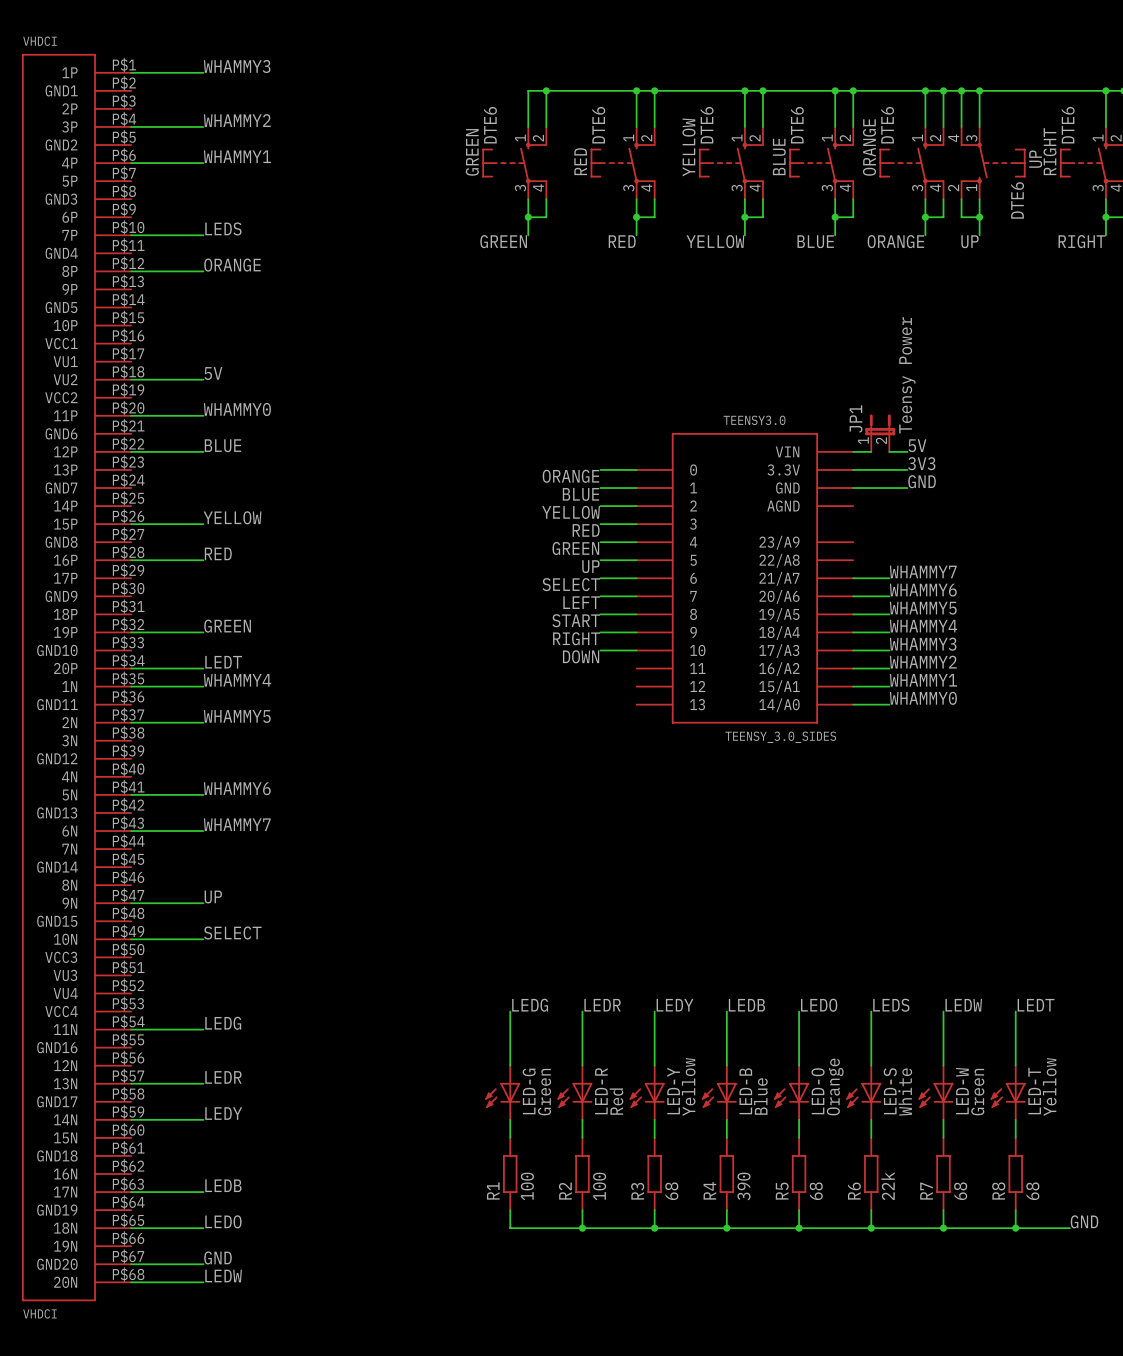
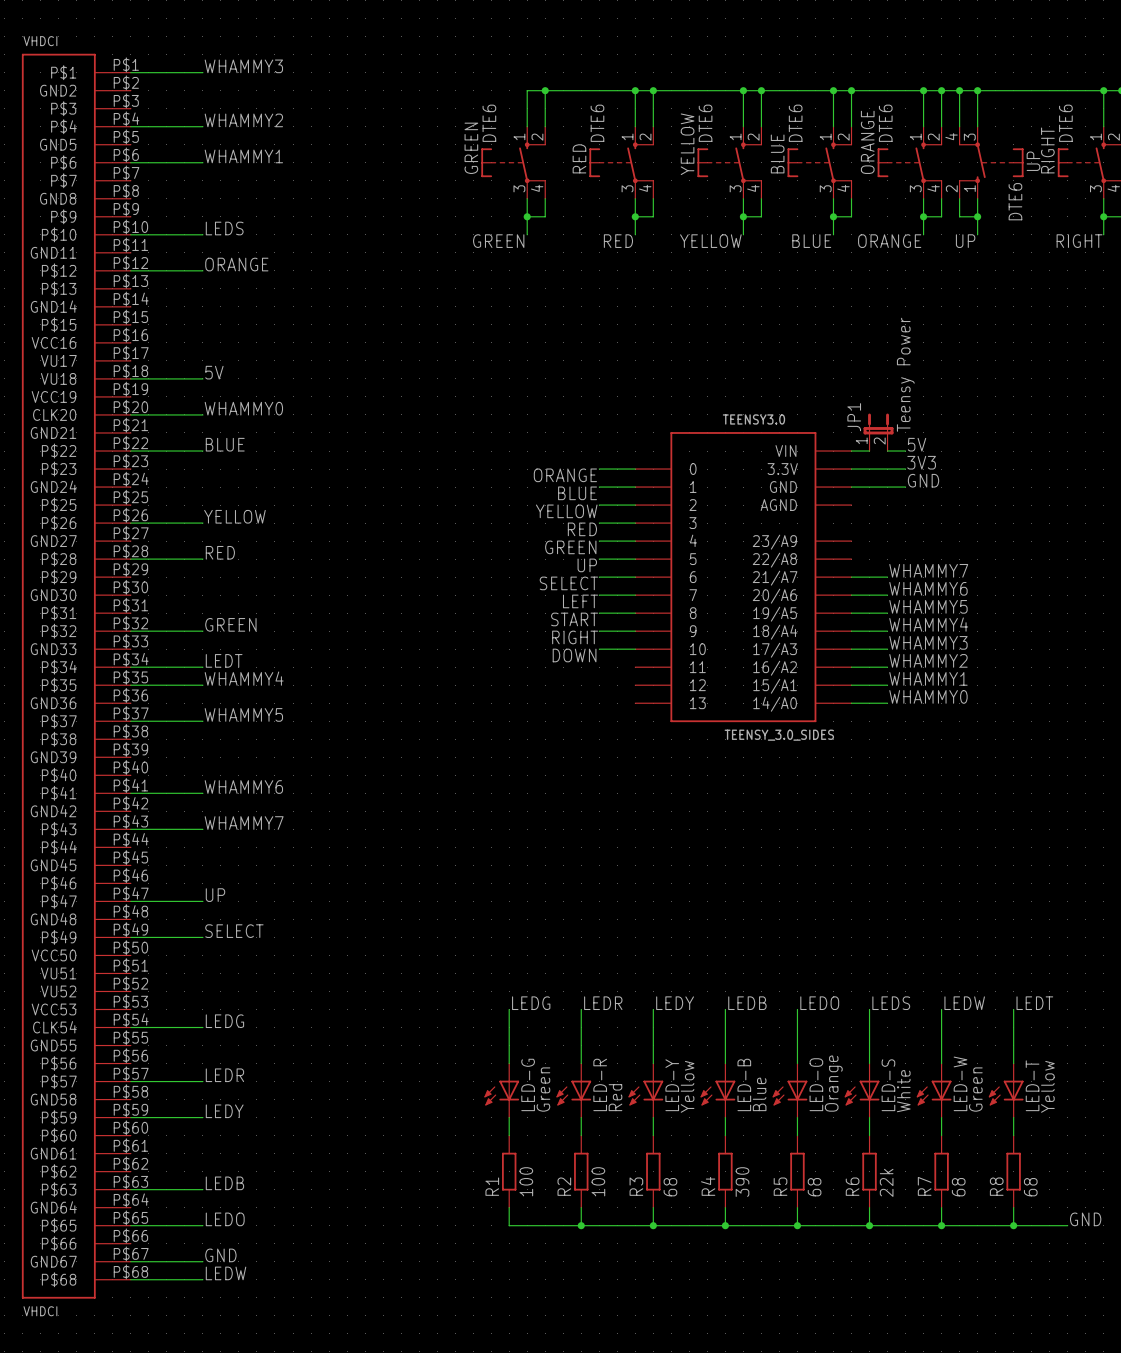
VHDCI symbol: [21, 53, 132, 1302] -> [21, 53, 131, 1299]

